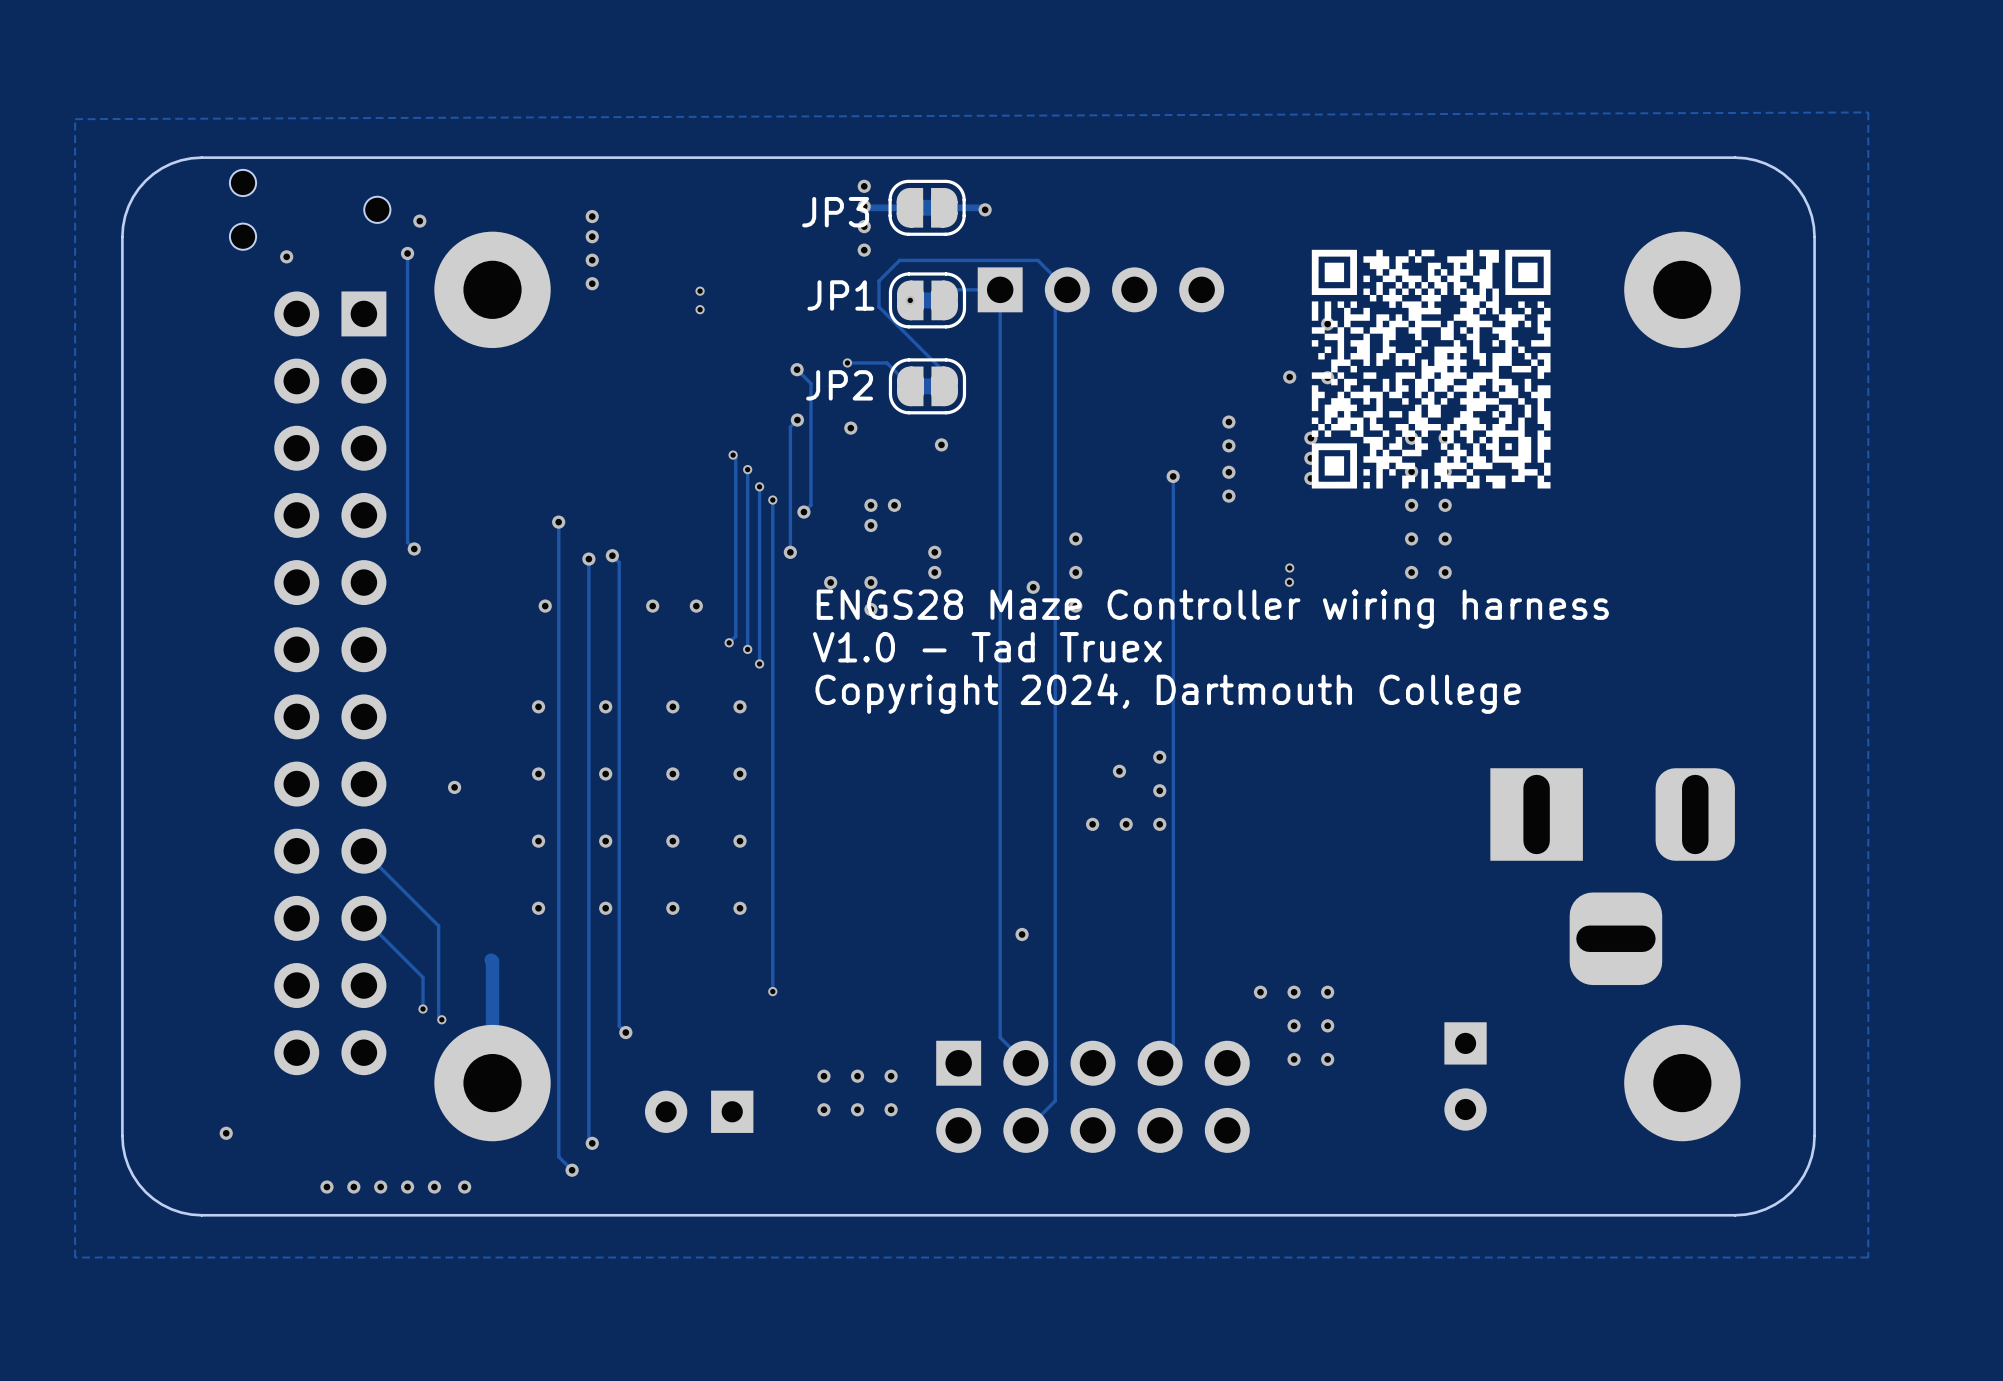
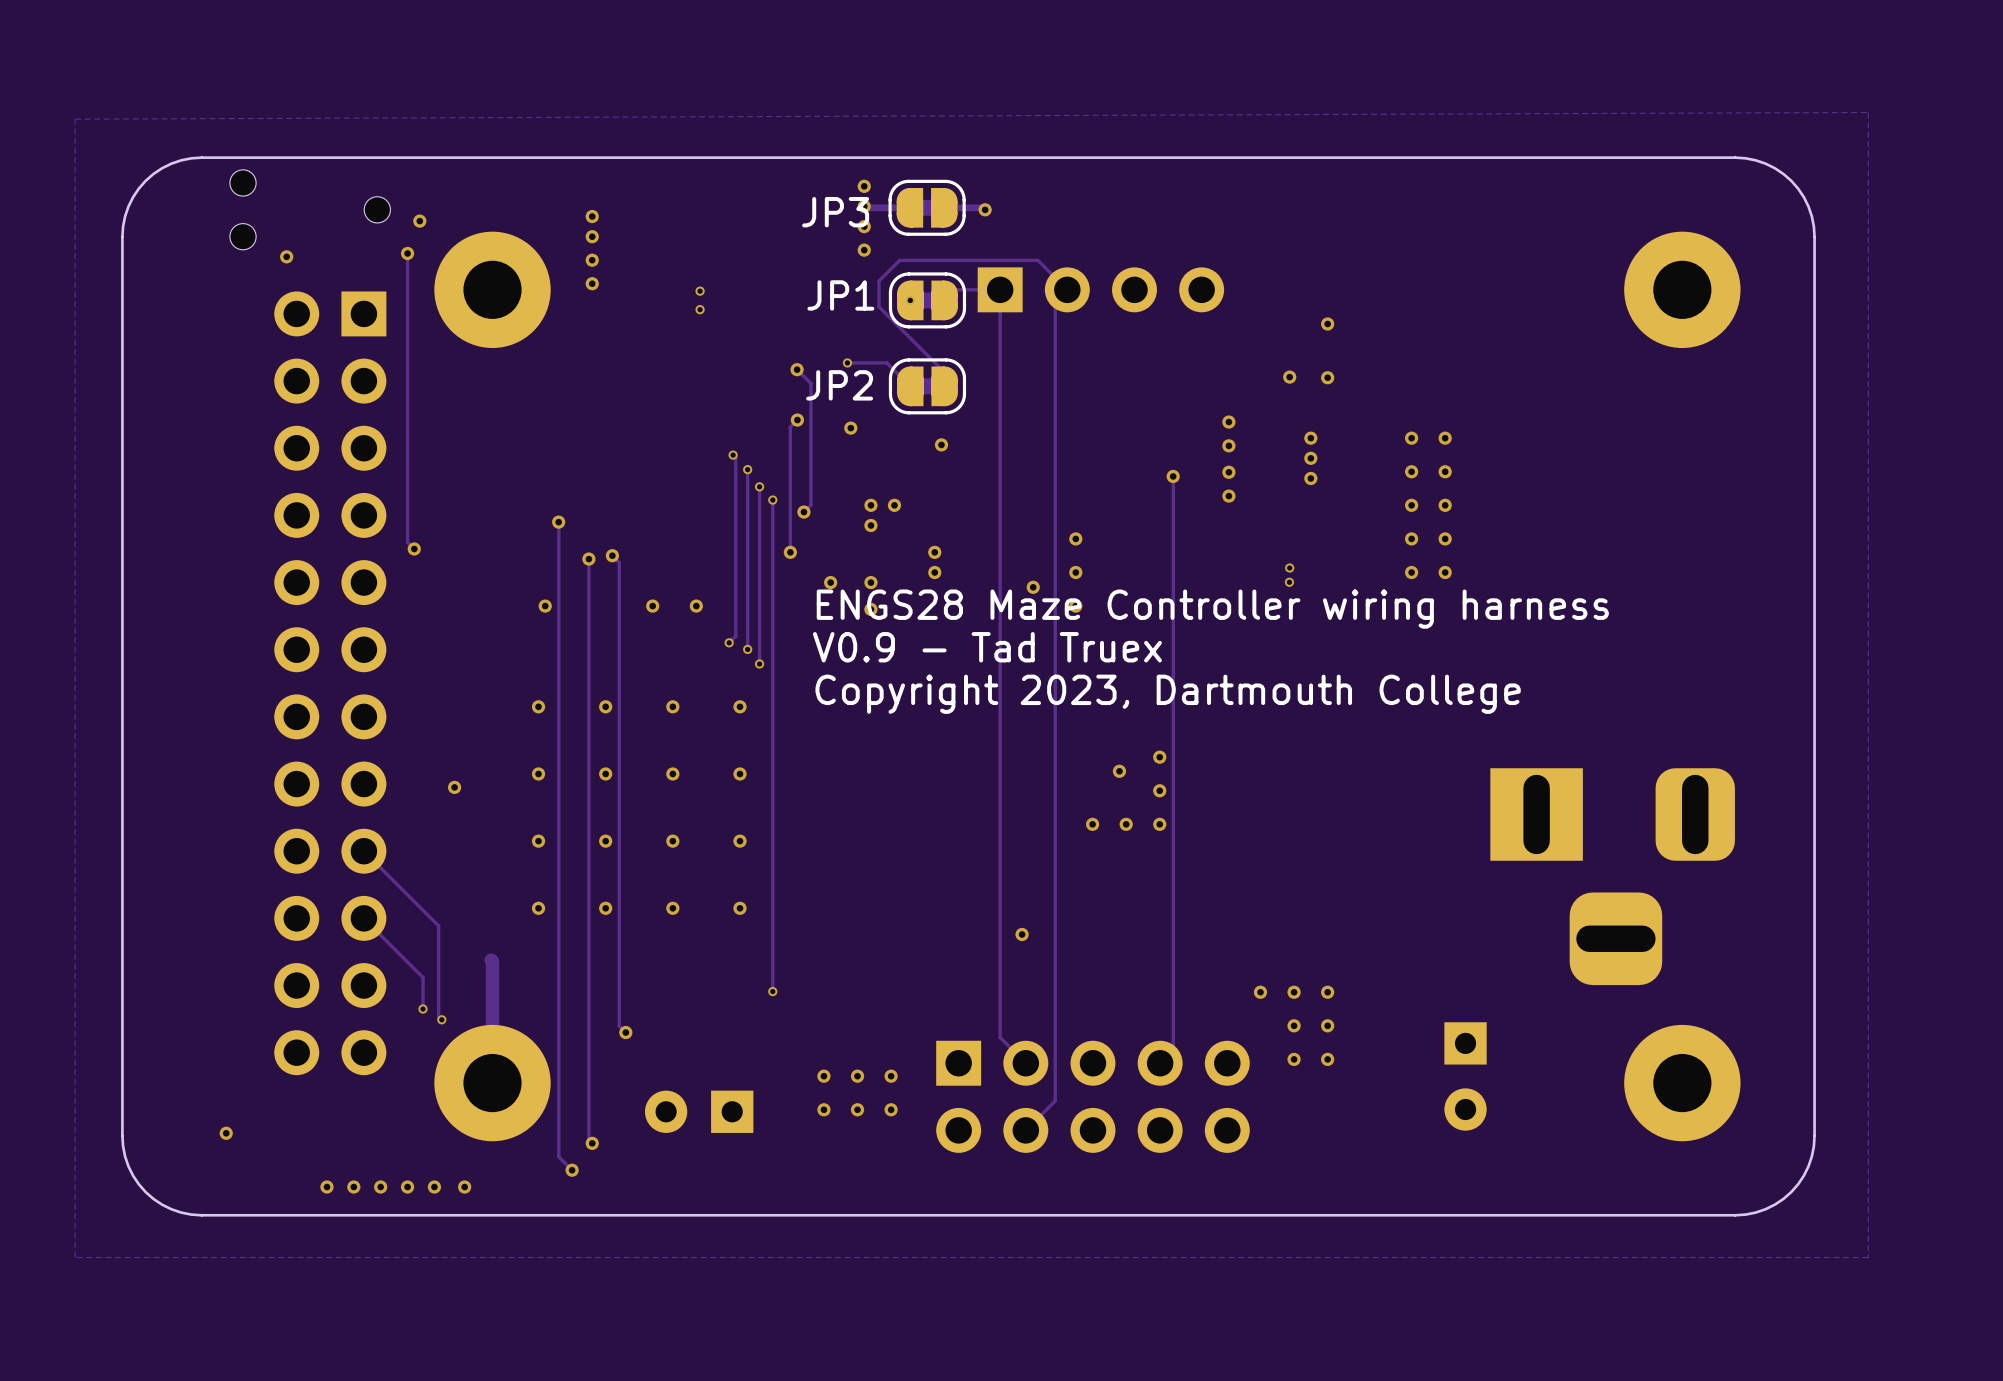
drawing: [1311, 249, 1551, 489] -> none
text: V1.0 - Tad Truex (987, 647) -> V0.9 - Tad Truex (987, 647)
text: Copyright 2024, Dartmouth College (1168, 693) -> Copyright 2023, Dartmouth College (1168, 694)

